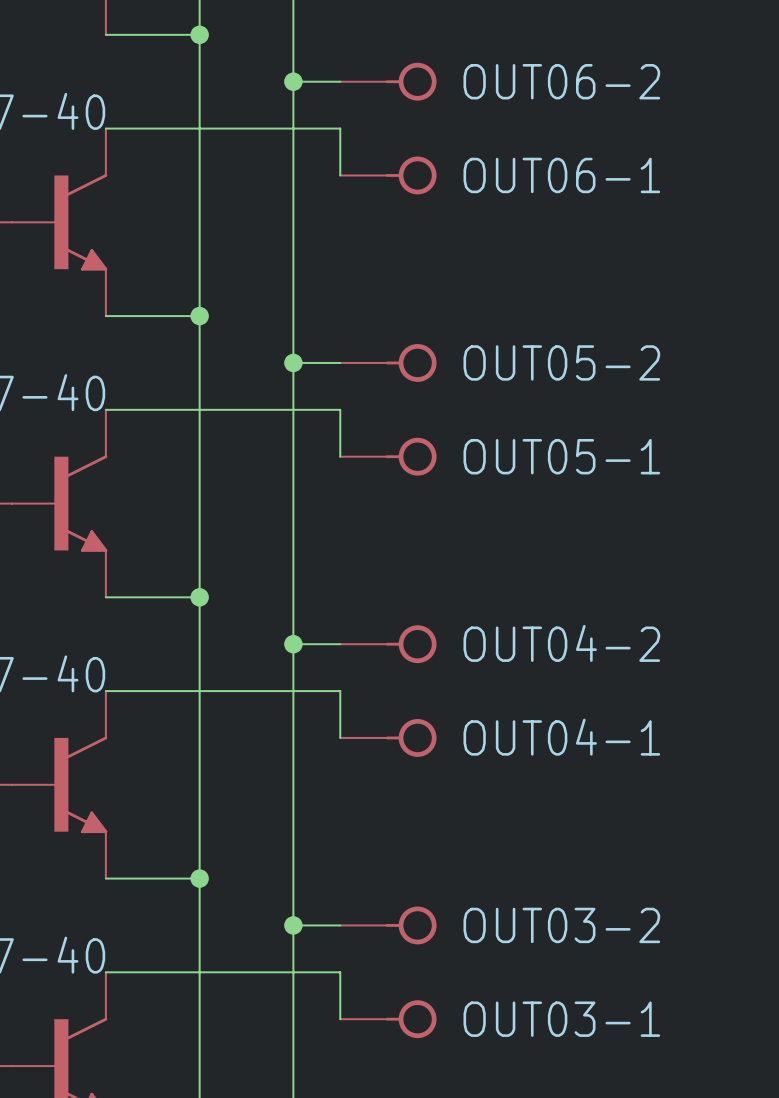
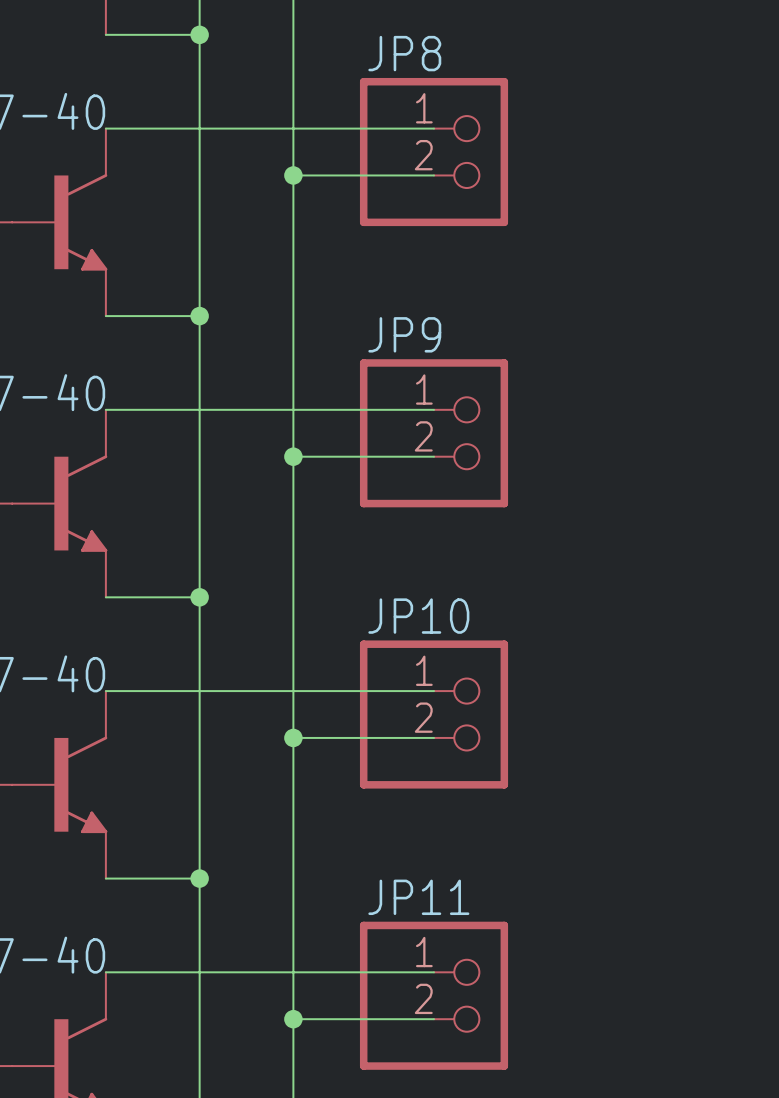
wire: (293, 81) (340, 81) -> none
junction: (293, 81) -> none
OUT06-2: (388, 81) -> none
wire: (340, 128) (340, 175) -> (340, 128) (434, 128)
JP8: none -> (434, 152)
wire: none -> (293, 175) (434, 175)
junction: none -> (293, 175)
OUT06-1: (388, 175) -> none
wire: (293, 362) (340, 362) -> none
junction: (293, 362) -> none
OUT05-2: (388, 362) -> none
wire: (340, 409) (340, 456) -> (340, 409) (434, 409)
JP9: none -> (434, 433)
wire: none -> (293, 456) (434, 456)
junction: none -> (293, 456)
OUT05-1: (388, 456) -> none
wire: (293, 644) (340, 644) -> none
junction: (293, 644) -> none
OUT04-2: (388, 644) -> none
wire: (340, 691) (340, 737) -> (340, 691) (434, 691)
JP10: none -> (434, 714)
wire: none -> (293, 737) (434, 737)
junction: none -> (293, 737)
OUT04-1: (388, 737) -> none
wire: (293, 925) (340, 925) -> none
junction: (293, 925) -> none
OUT03-2: (388, 925) -> none
wire: (340, 972) (340, 1019) -> (340, 972) (434, 972)
JP11: none -> (434, 995)
wire: none -> (293, 1019) (434, 1019)
junction: none -> (293, 1019)
OUT03-1: (388, 1019) -> none

